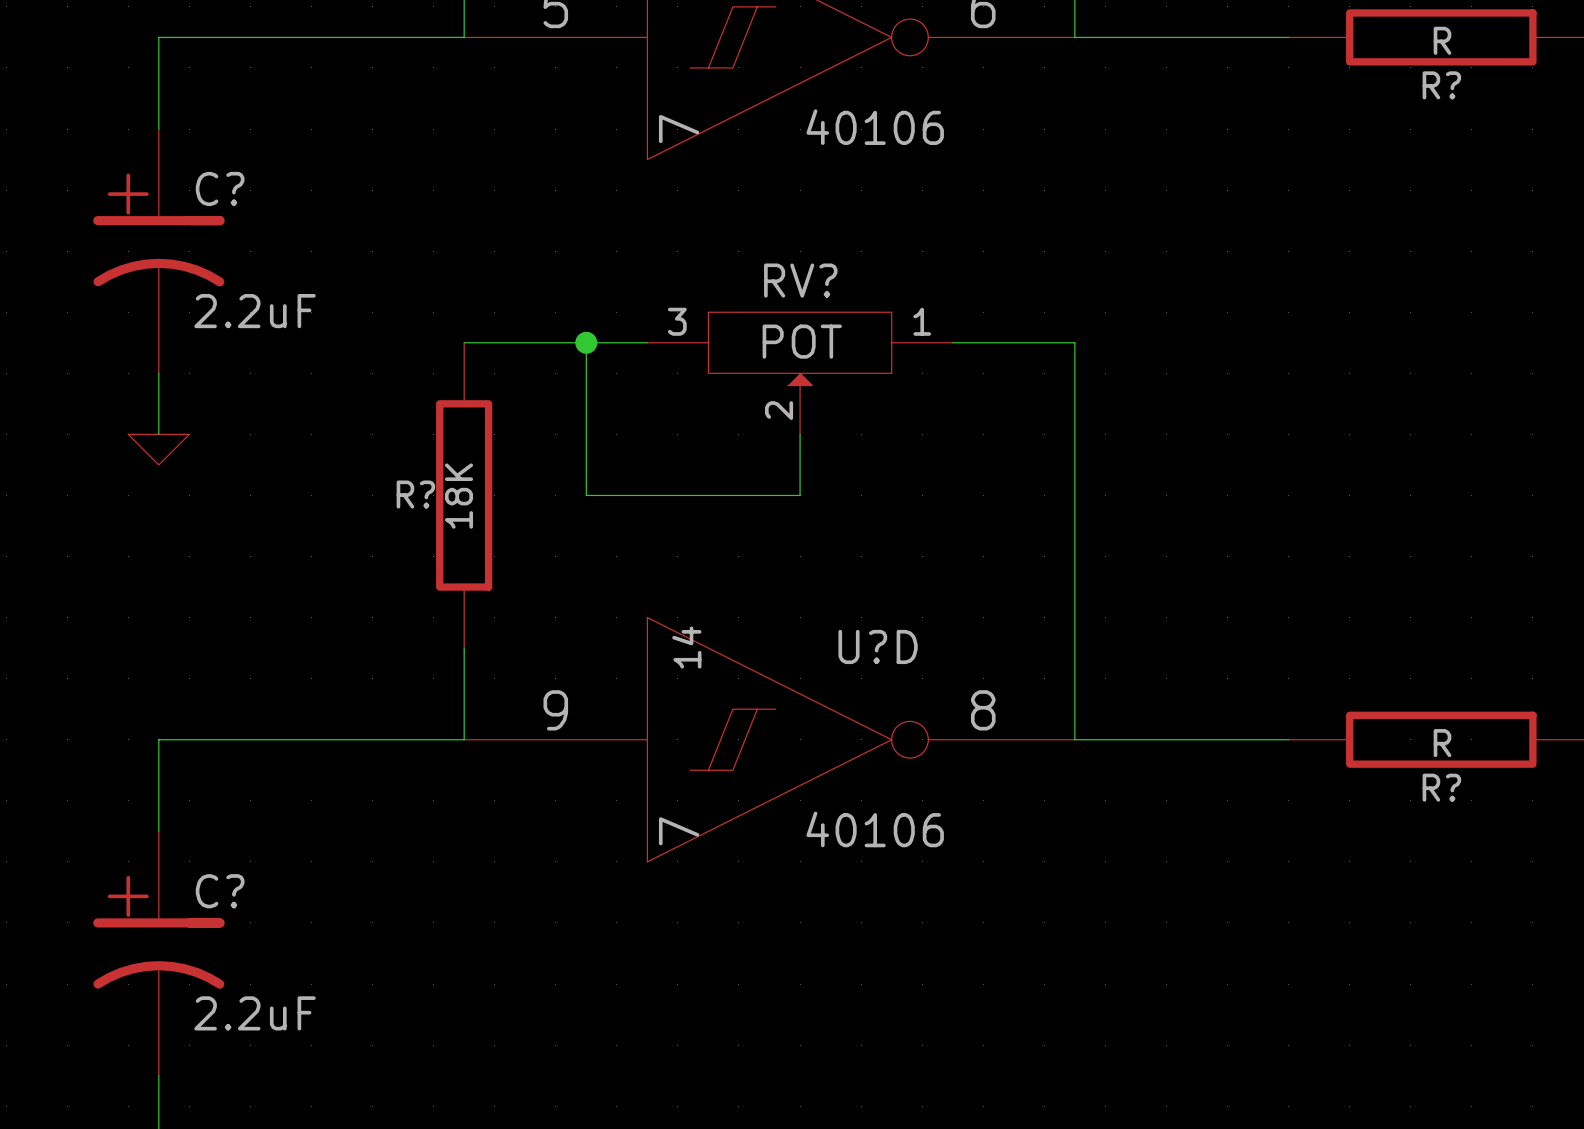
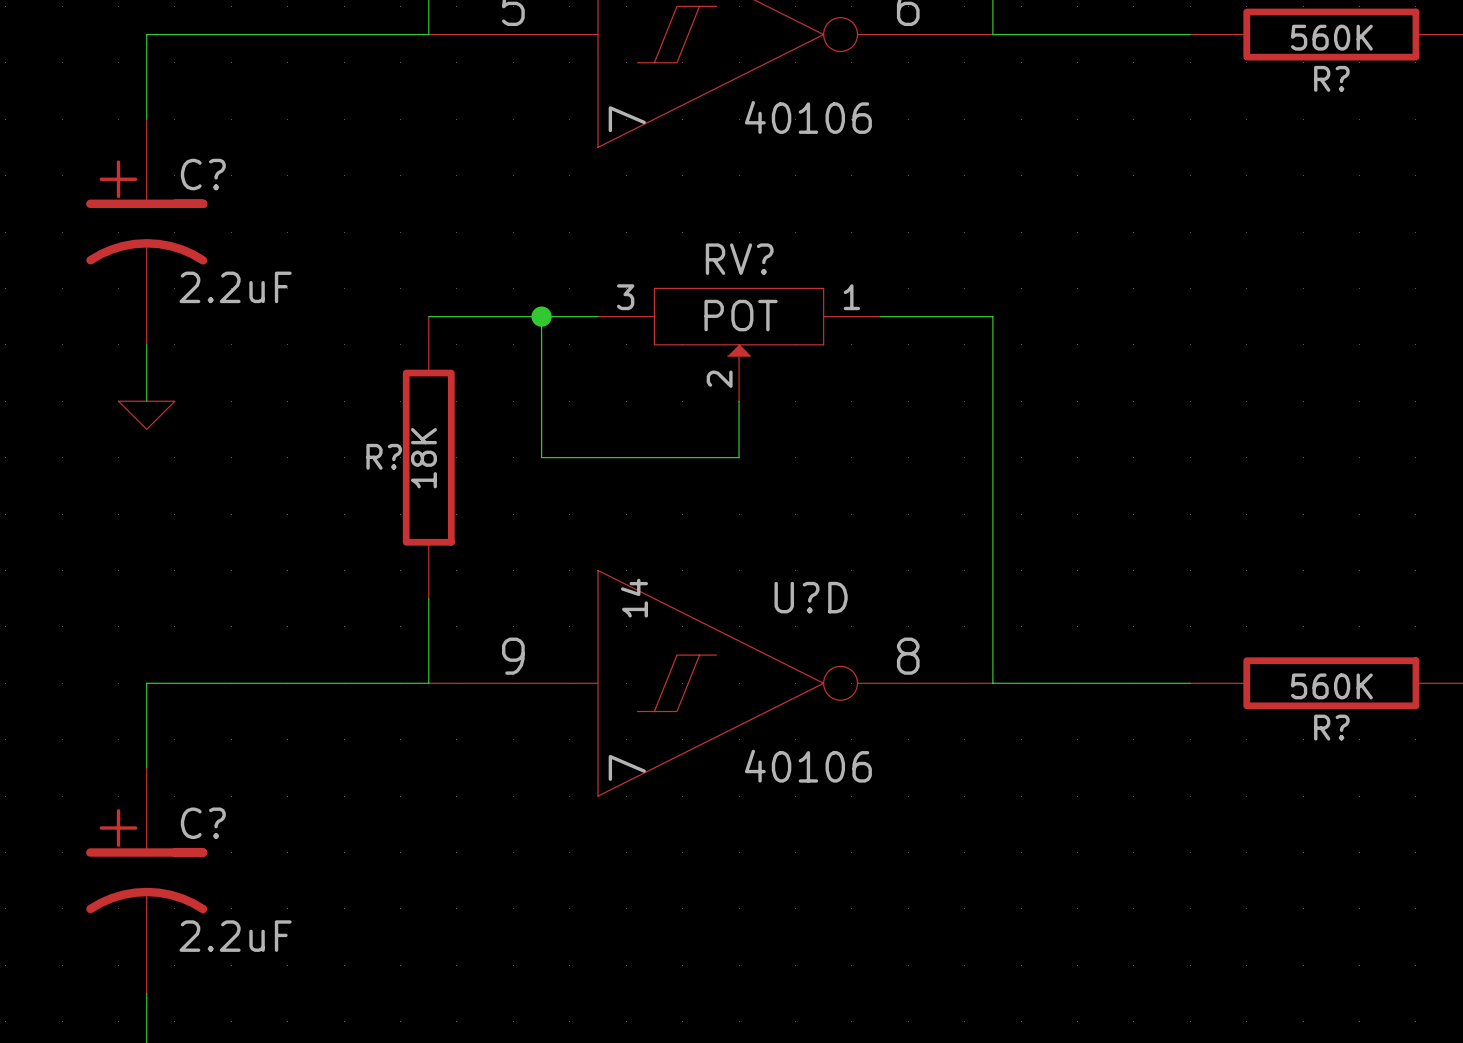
R? value: R (1442, 40) -> 560K (1331, 37)
R? value: R (1442, 743) -> 560K (1331, 686)

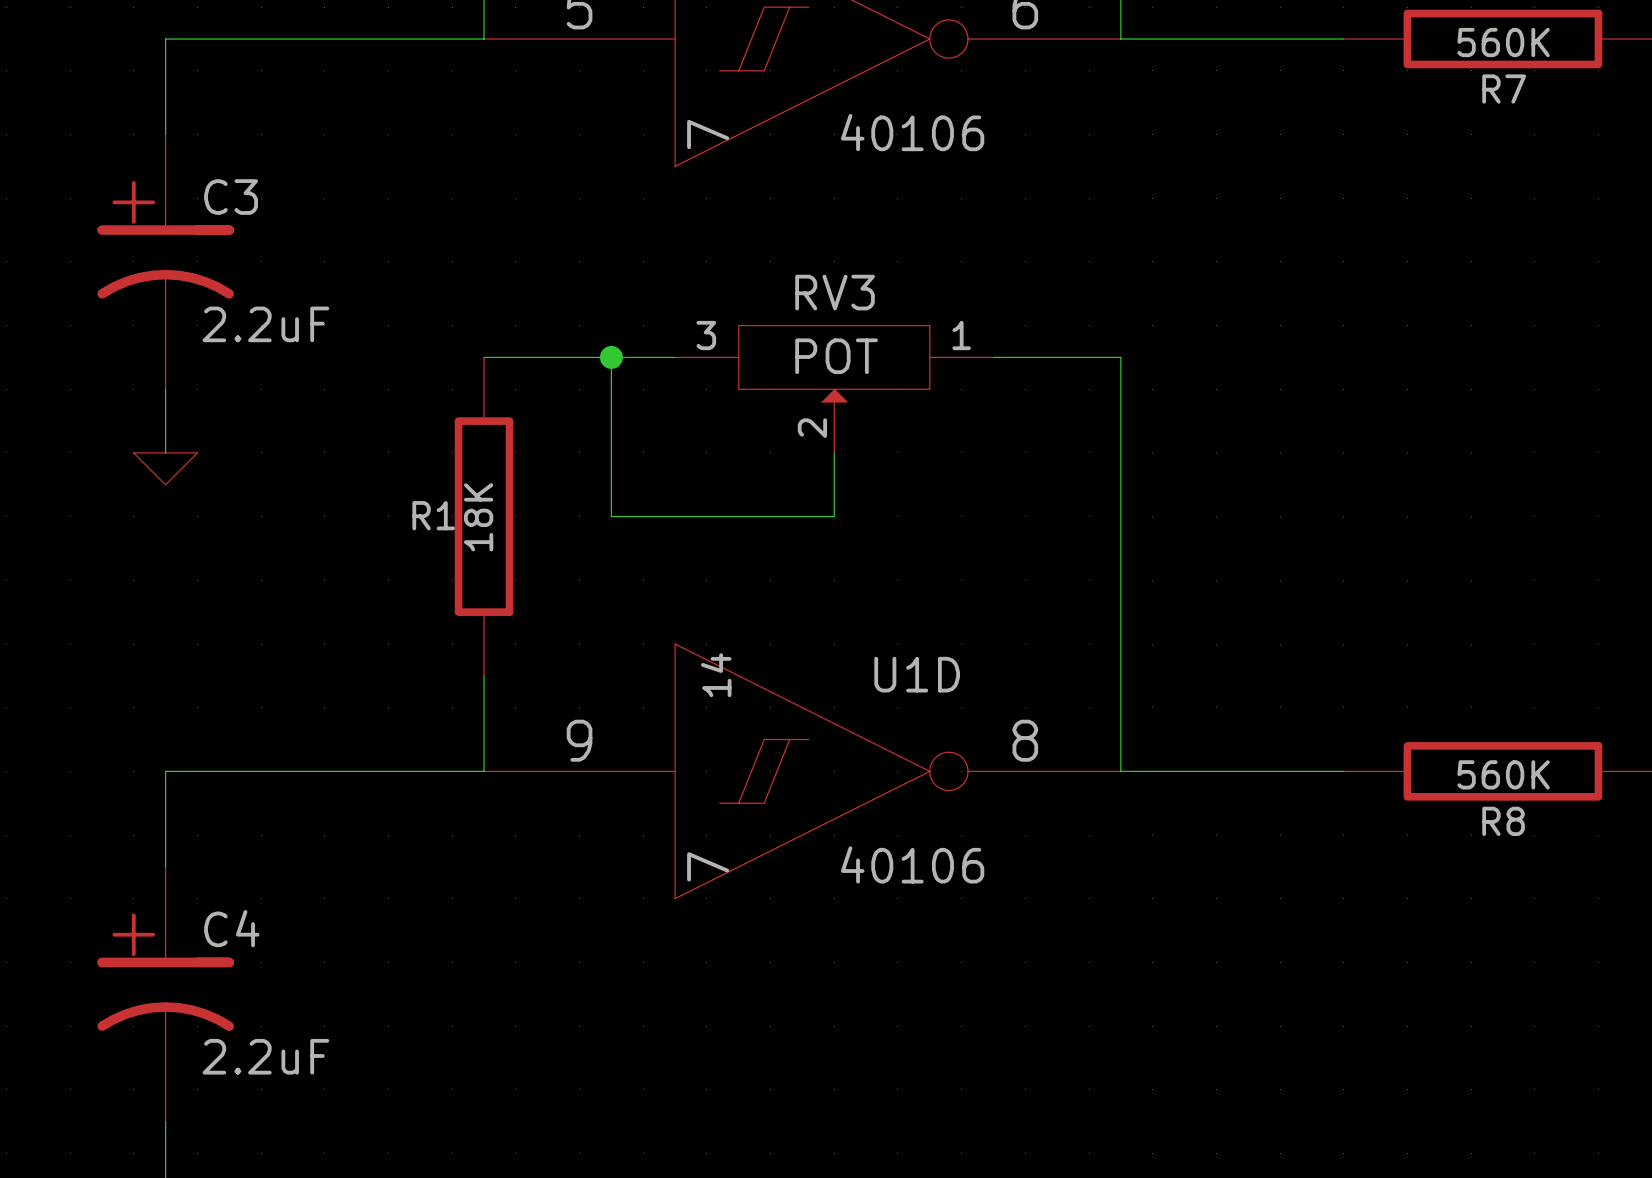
R? name: R? (1331, 78) -> R7 (1504, 89)
C? name: C? (203, 174) -> C3 (231, 197)
RV? name: RV? (739, 259) -> RV3 (835, 292)
R? name: R? (384, 456) -> R1 (433, 515)
U?D name: U?D (811, 597) -> U1D (917, 674)
R? name: R? (1331, 727) -> R8 (1503, 821)
C? name: C? (203, 823) -> C4 (231, 928)

